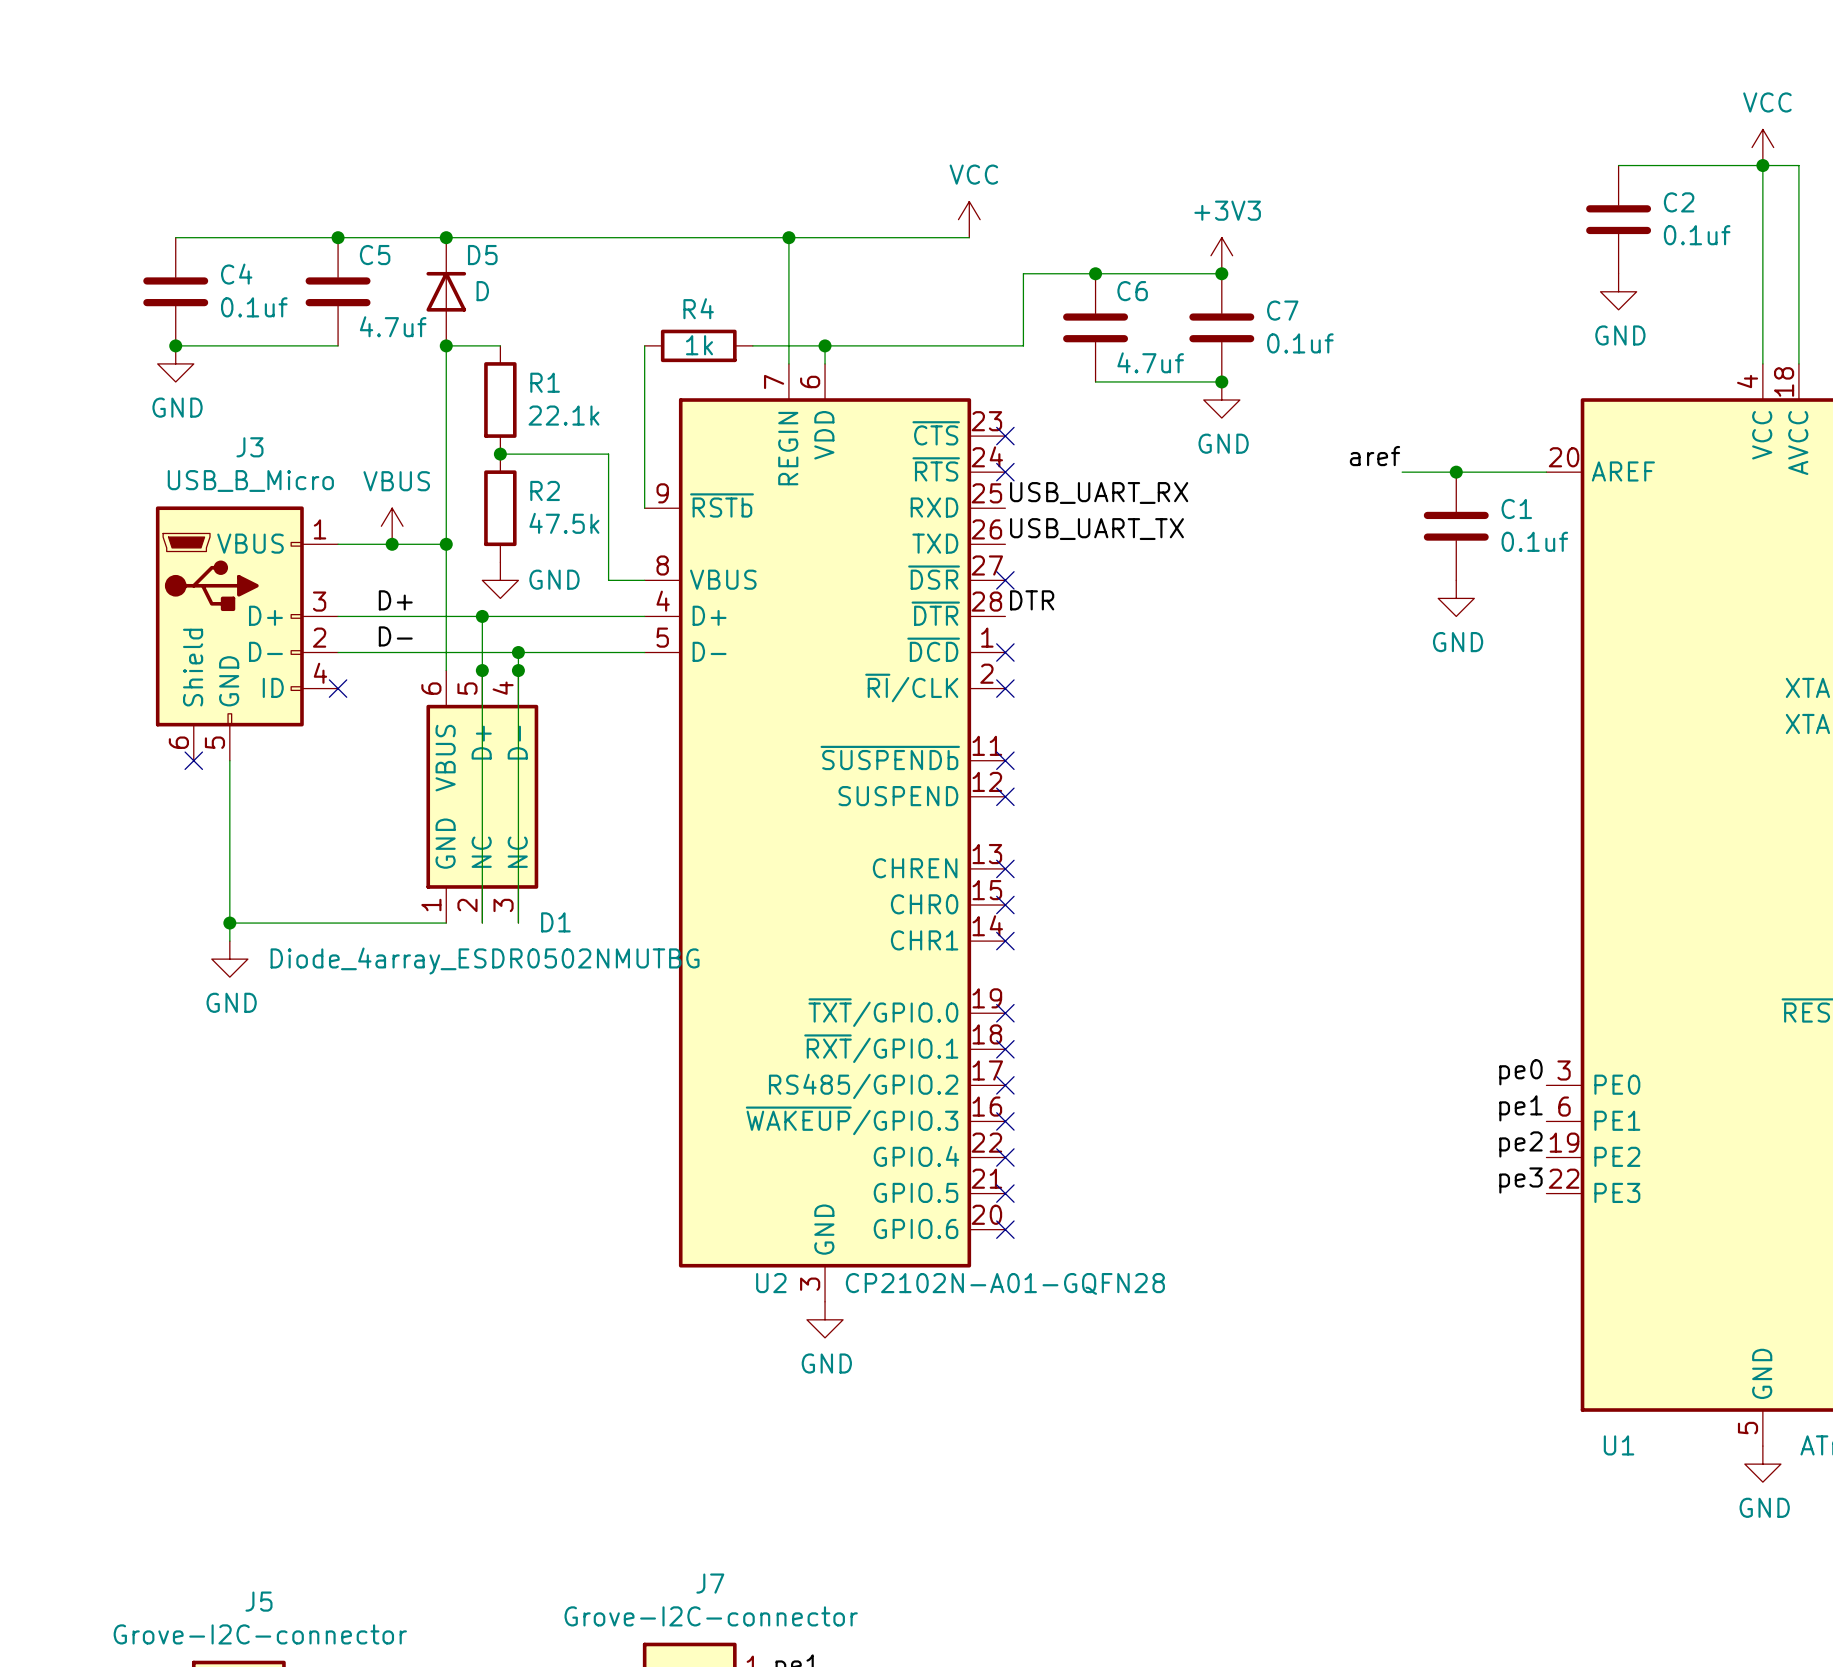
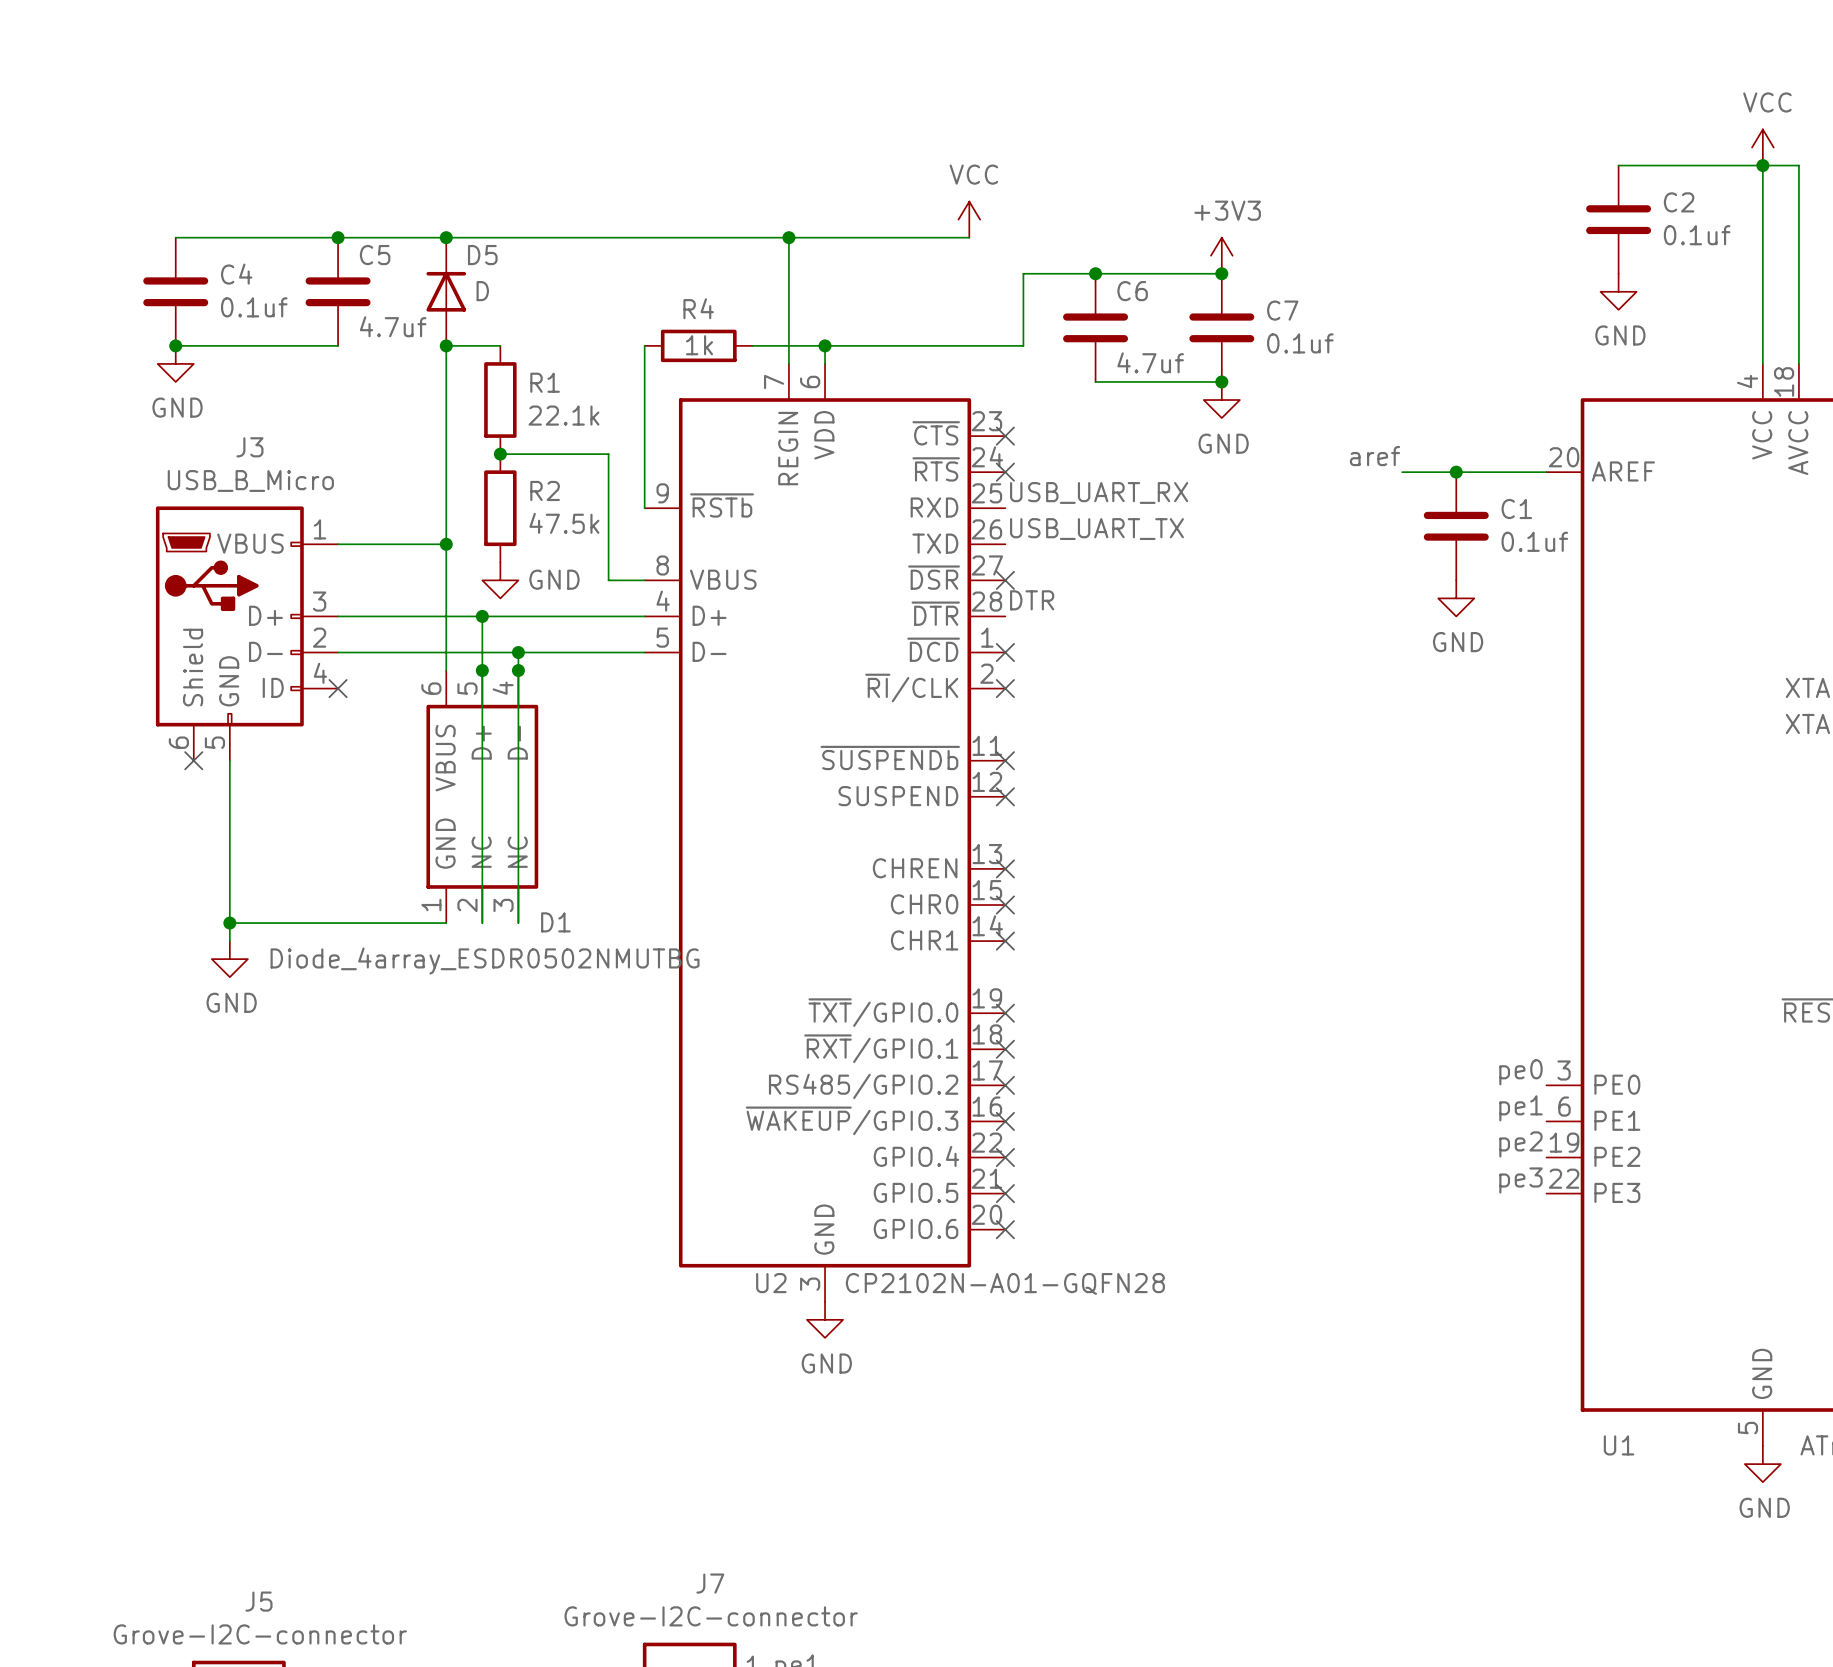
power symbol: VBUS (392, 526) -> none
junction: (392, 544) -> none
label: D+ (395, 600) -> none
label: D- (395, 636) -> none

